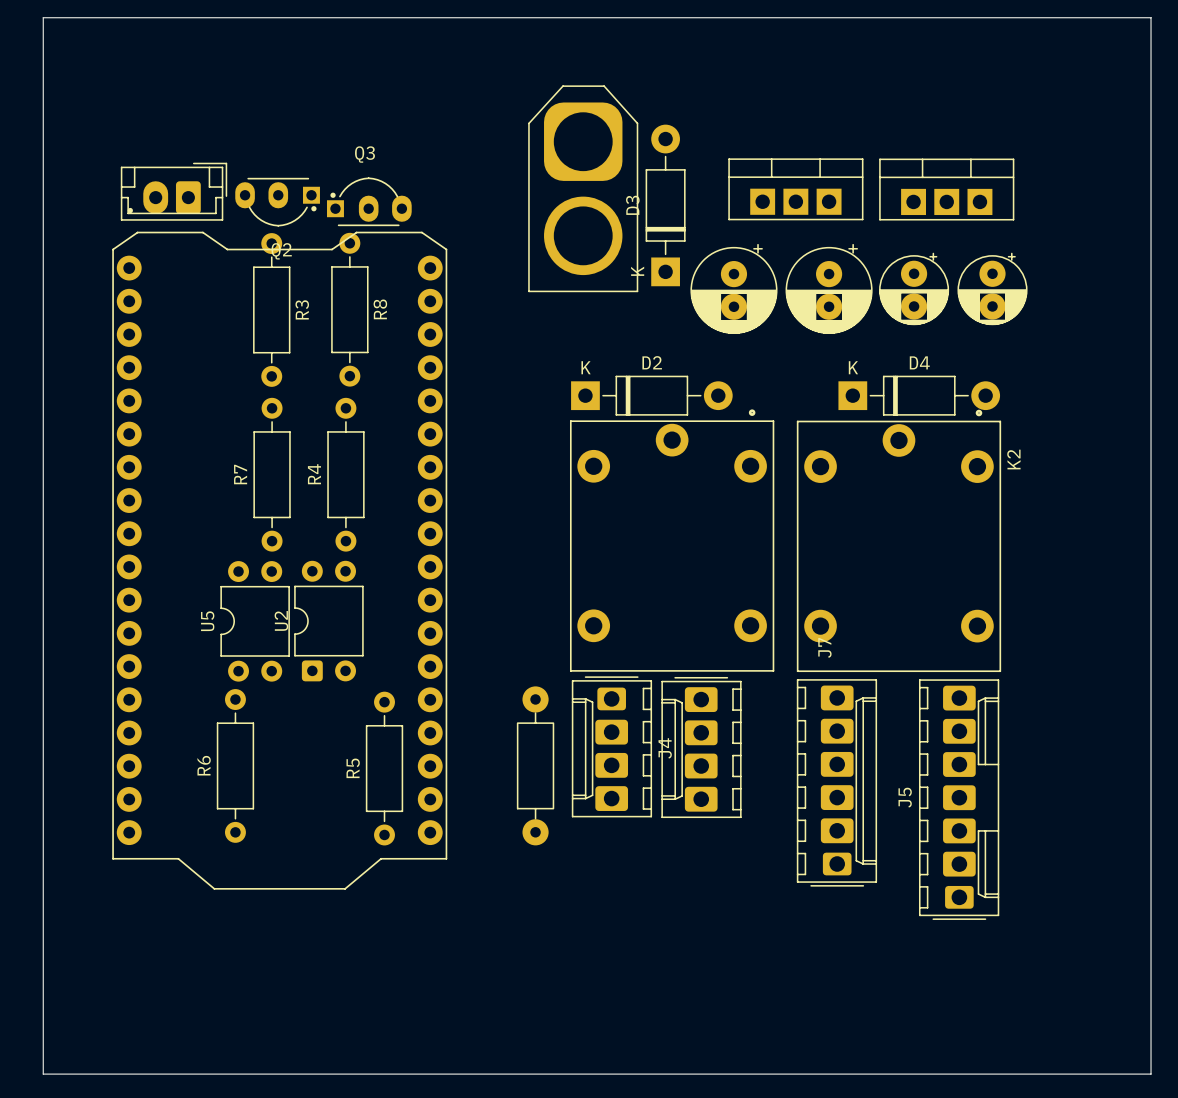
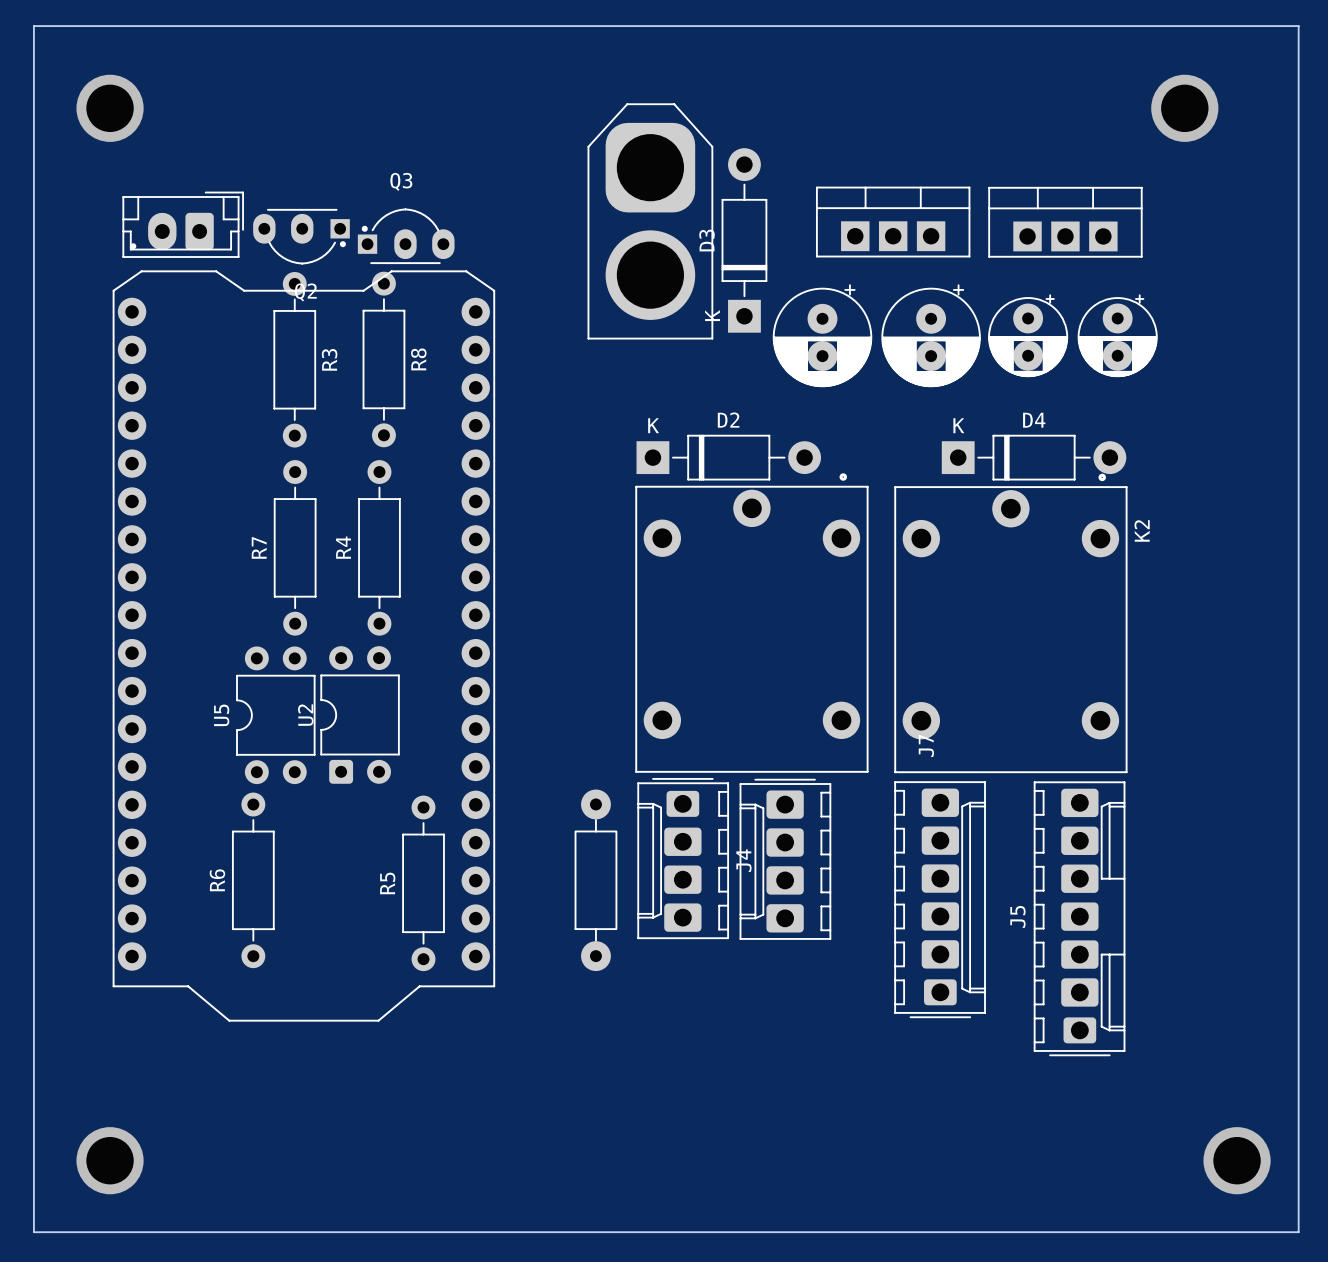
via: none -> (110, 108)
via: none -> (1184, 108)
via: none -> (110, 1160)
via: none -> (1237, 1160)

